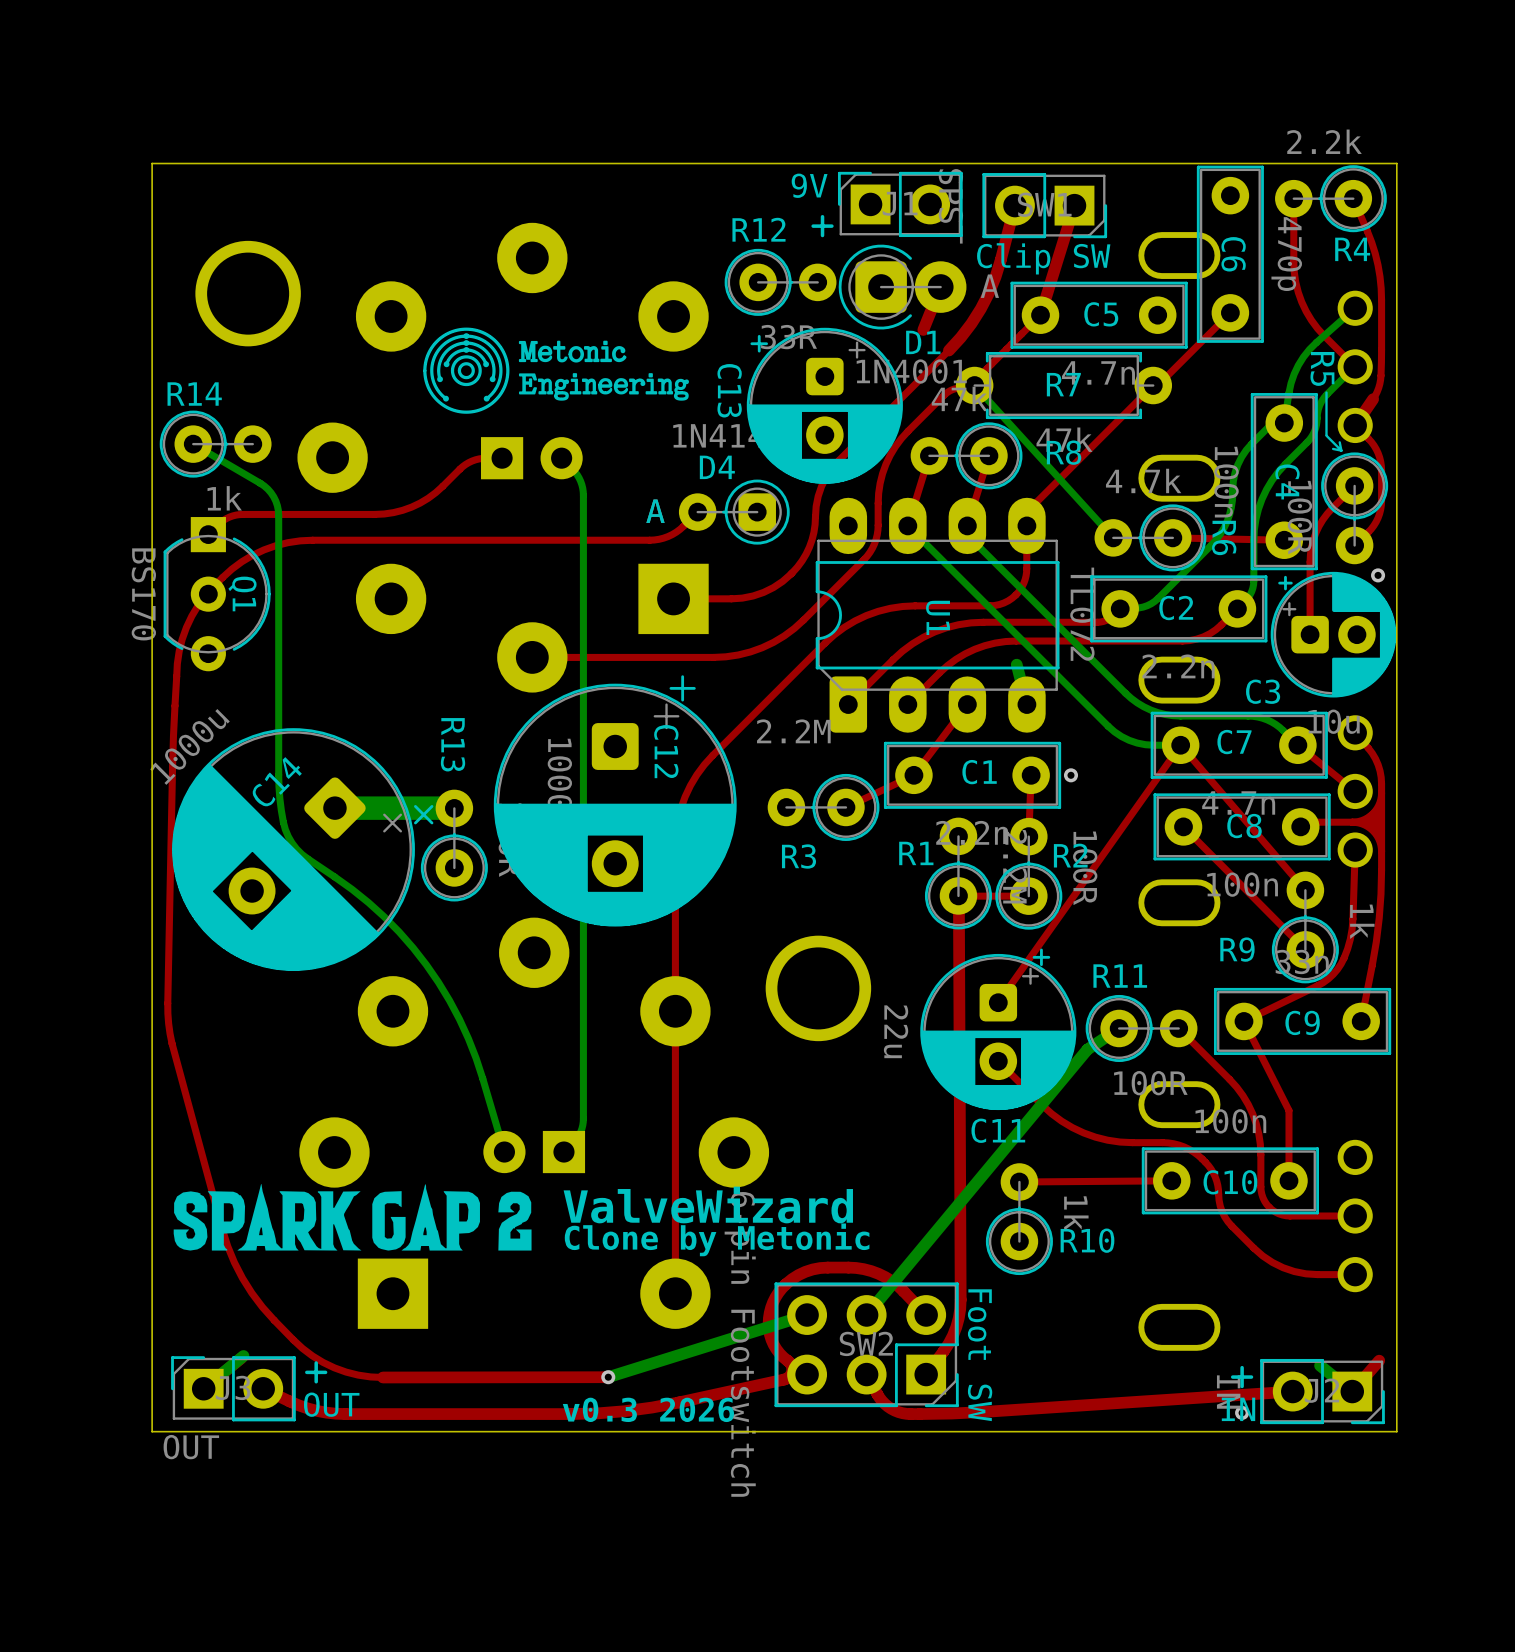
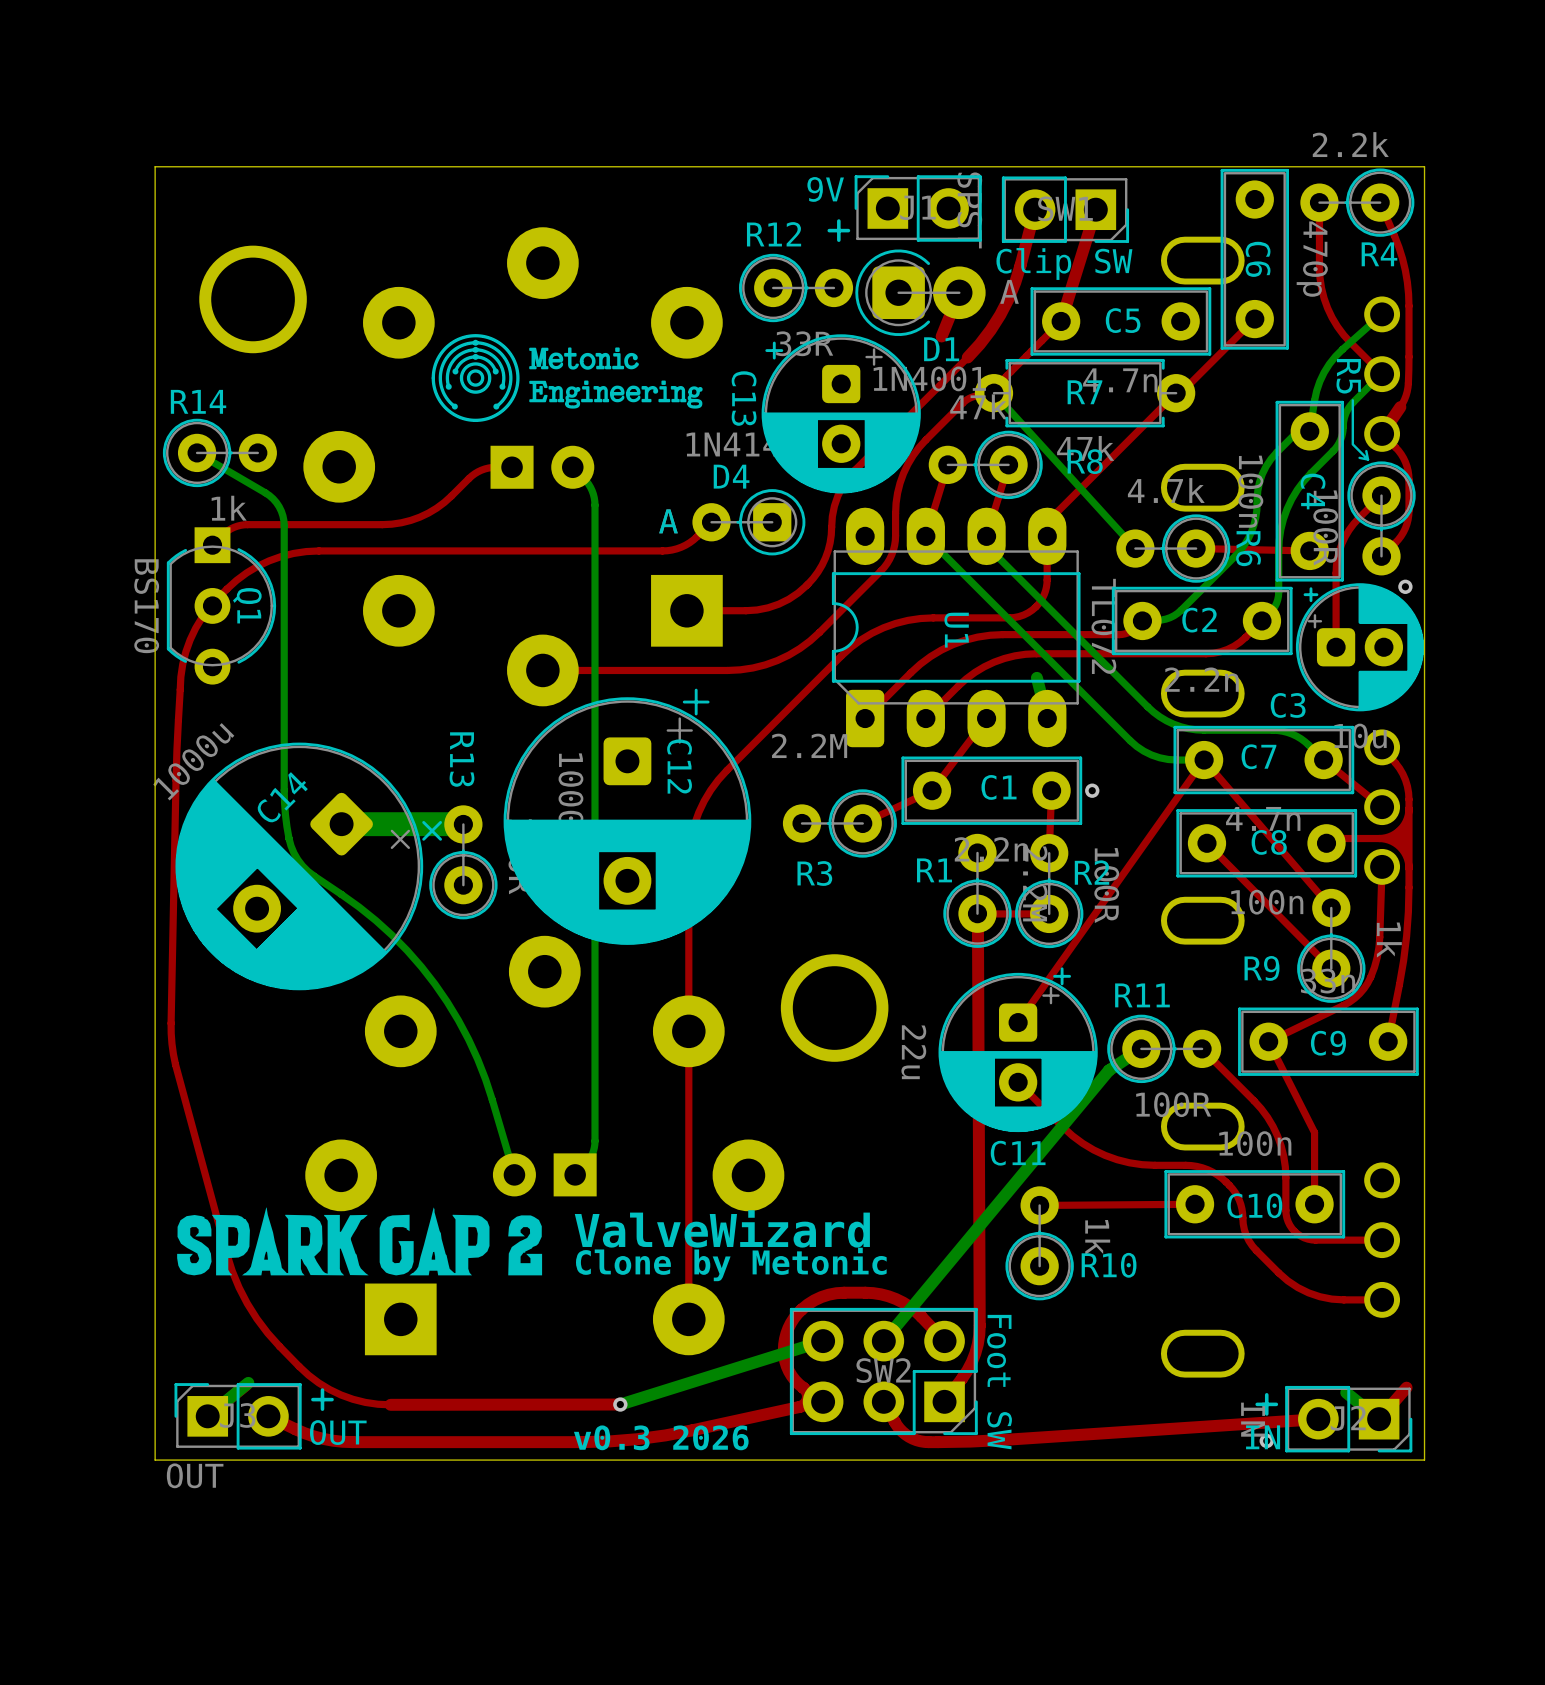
SW2 value: 6-pin Footswitch (740, 1344) -> none

